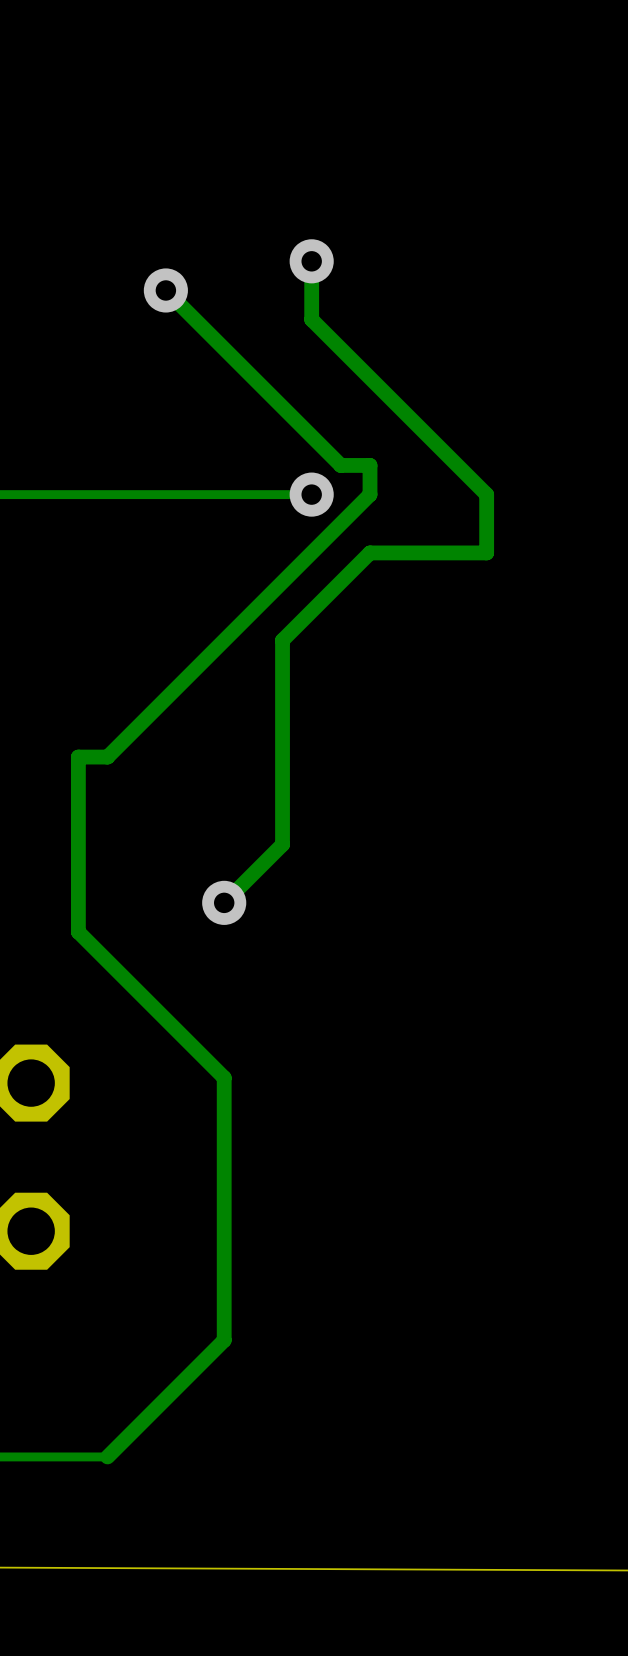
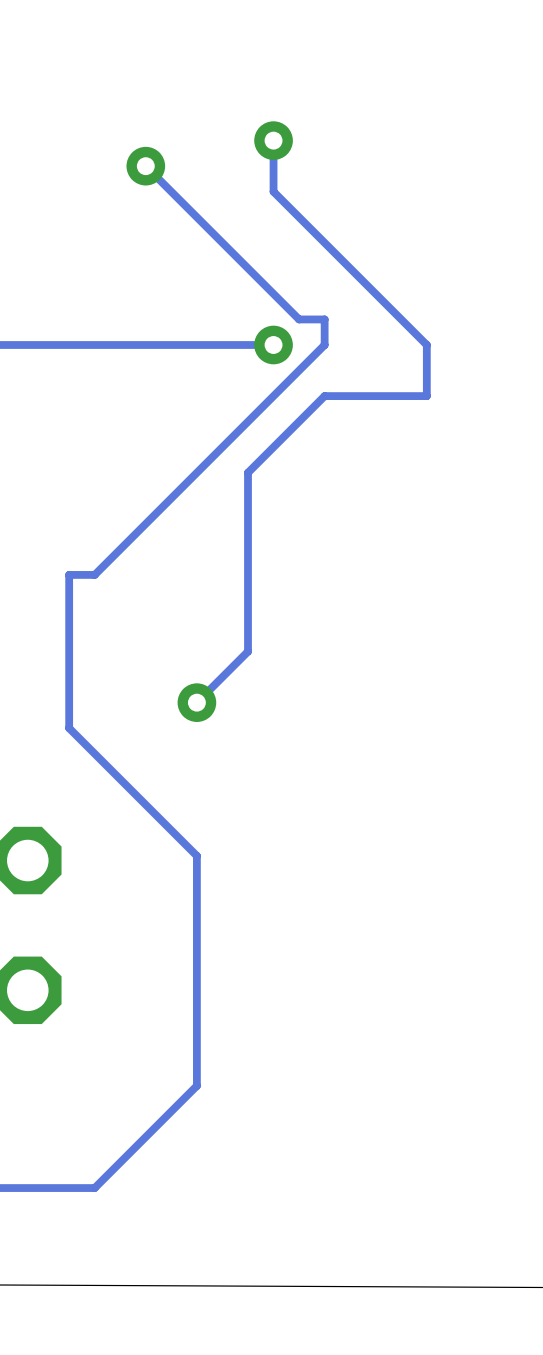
track width: thick (311, 261) (311, 319) (486, 494) (486, 552) (370, 552) (282, 640) (282, 844) (224, 902) -> thin (273, 140) (273, 191) (426, 345) (426, 396) (324, 396) (248, 472) (248, 651) (196, 702)
track width: thick (165, 290) (340, 465) (370, 465) (370, 494) (107, 757) (78, 757) (78, 932) (224, 1077) (224, 1340) (107, 1456) -> thin (145, 166) (299, 319) (324, 319) (324, 345) (94, 574) (69, 574) (69, 728) (196, 855) (196, 1085) (94, 1188)

